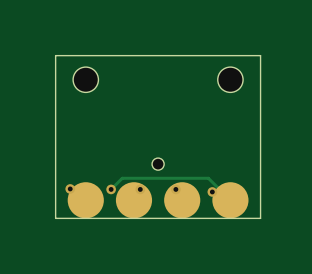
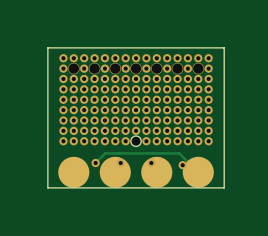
via: none -> (63, 58)
via: none -> (73, 58)
via: none -> (84, 58)
via: none -> (94, 58)
via: none -> (104, 58)
via: none -> (115, 58)
via: none -> (125, 58)
via: none -> (136, 58)
via: none -> (146, 58)
via: none -> (156, 58)
via: none -> (167, 58)
via: none -> (177, 58)
via: none -> (187, 58)
via: none -> (198, 58)
via: none -> (208, 58)
via: none -> (63, 68)
part: (85, 79) -> none
via: none -> (73, 68)
via: none -> (84, 68)
via: none -> (94, 68)
via: none -> (104, 68)
via: none -> (115, 68)
via: none -> (125, 68)
via: none -> (136, 68)
via: none -> (146, 68)
via: none -> (156, 68)
via: none -> (167, 68)
via: none -> (177, 68)
via: none -> (187, 68)
part: (230, 79) -> none
via: none -> (198, 68)
via: none -> (208, 68)
via: none -> (63, 78)
via: none -> (73, 78)
via: none -> (84, 78)
via: none -> (94, 78)
via: none -> (104, 78)
via: none -> (115, 78)
via: none -> (125, 78)
via: none -> (136, 78)
via: none -> (146, 78)
via: none -> (156, 78)
via: none -> (167, 78)
via: none -> (177, 78)
via: none -> (187, 78)
via: none -> (198, 78)
via: none -> (208, 78)
via: none -> (63, 89)
via: none -> (73, 89)
via: none -> (84, 89)
via: none -> (94, 89)
via: none -> (104, 89)
via: none -> (115, 89)
via: none -> (125, 89)
via: none -> (136, 89)
via: none -> (146, 89)
via: none -> (156, 89)
via: none -> (167, 89)
via: none -> (177, 89)
via: none -> (187, 89)
via: none -> (198, 89)
via: none -> (208, 89)
via: none -> (63, 99)
via: none -> (73, 99)
via: none -> (84, 99)
via: none -> (94, 99)
via: none -> (104, 99)
via: none -> (115, 99)
via: none -> (125, 99)
via: none -> (136, 99)
via: none -> (146, 99)
via: none -> (156, 99)
via: none -> (167, 99)
via: none -> (177, 99)
via: none -> (187, 99)
via: none -> (198, 99)
via: none -> (208, 99)
via: none -> (63, 110)
via: none -> (73, 110)
via: none -> (84, 110)
via: none -> (94, 110)
via: none -> (104, 110)
via: none -> (115, 110)
via: none -> (125, 110)
via: none -> (136, 110)
via: none -> (146, 110)
via: none -> (156, 110)
via: none -> (167, 110)
via: none -> (177, 110)
via: none -> (187, 110)
via: none -> (198, 110)
via: none -> (208, 110)
via: none -> (63, 120)
via: none -> (73, 120)
via: none -> (84, 120)
via: none -> (94, 120)
via: none -> (104, 120)
via: none -> (115, 120)
via: none -> (125, 120)
via: none -> (136, 120)
via: none -> (146, 120)
via: none -> (156, 120)
via: none -> (167, 120)
via: none -> (177, 120)
via: none -> (187, 120)
via: none -> (198, 120)
via: none -> (208, 120)
via: none -> (63, 130)
via: none -> (73, 130)
via: none -> (84, 130)
via: none -> (94, 130)
via: none -> (104, 130)
via: none -> (115, 130)
via: none -> (125, 130)
via: none -> (136, 130)
via: none -> (146, 130)
via: none -> (156, 130)
via: none -> (167, 130)
via: none -> (177, 130)
via: none -> (187, 130)
via: none -> (198, 130)
via: none -> (208, 130)
via: none -> (63, 141)
via: none -> (73, 141)
via: none -> (84, 141)
via: none -> (94, 141)
via: none -> (104, 141)
via: none -> (115, 141)
via: none -> (125, 141)
via: none -> (146, 141)
via: none -> (156, 141)
via: none -> (167, 141)
via: none -> (177, 141)
via: none -> (187, 141)
via: none -> (198, 141)
via: none -> (208, 141)
via: (70, 188) -> none

